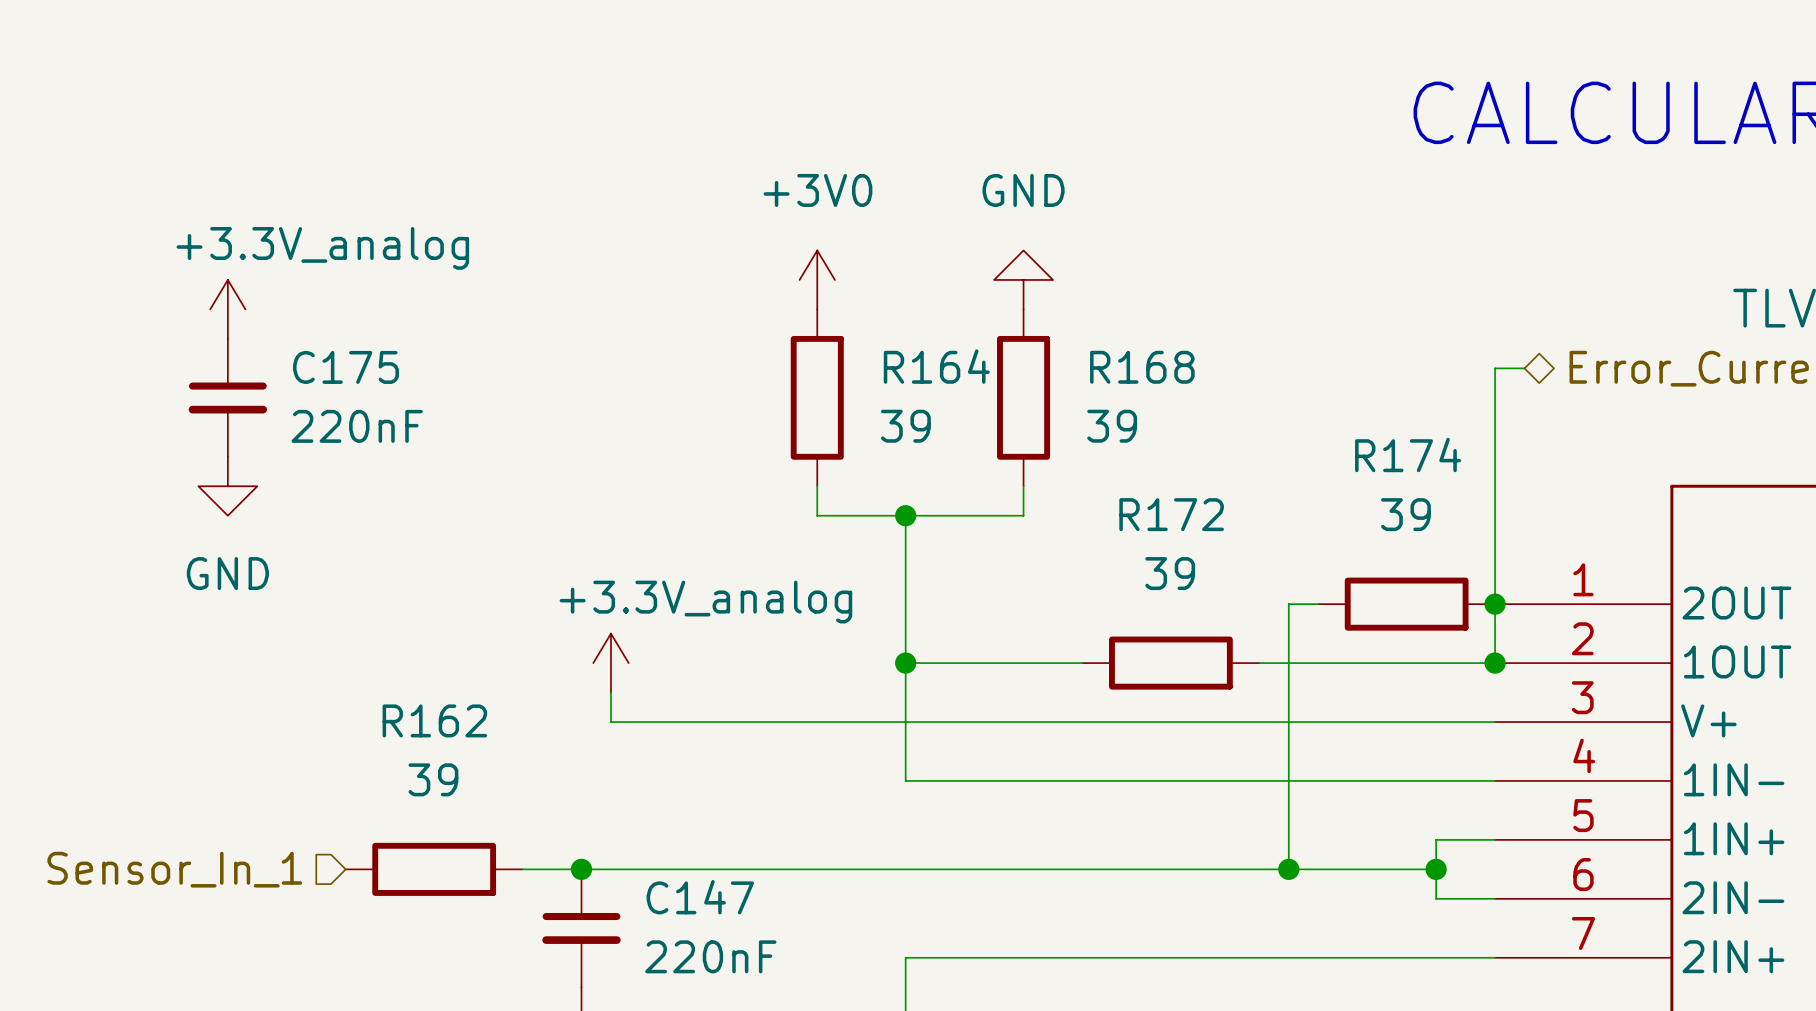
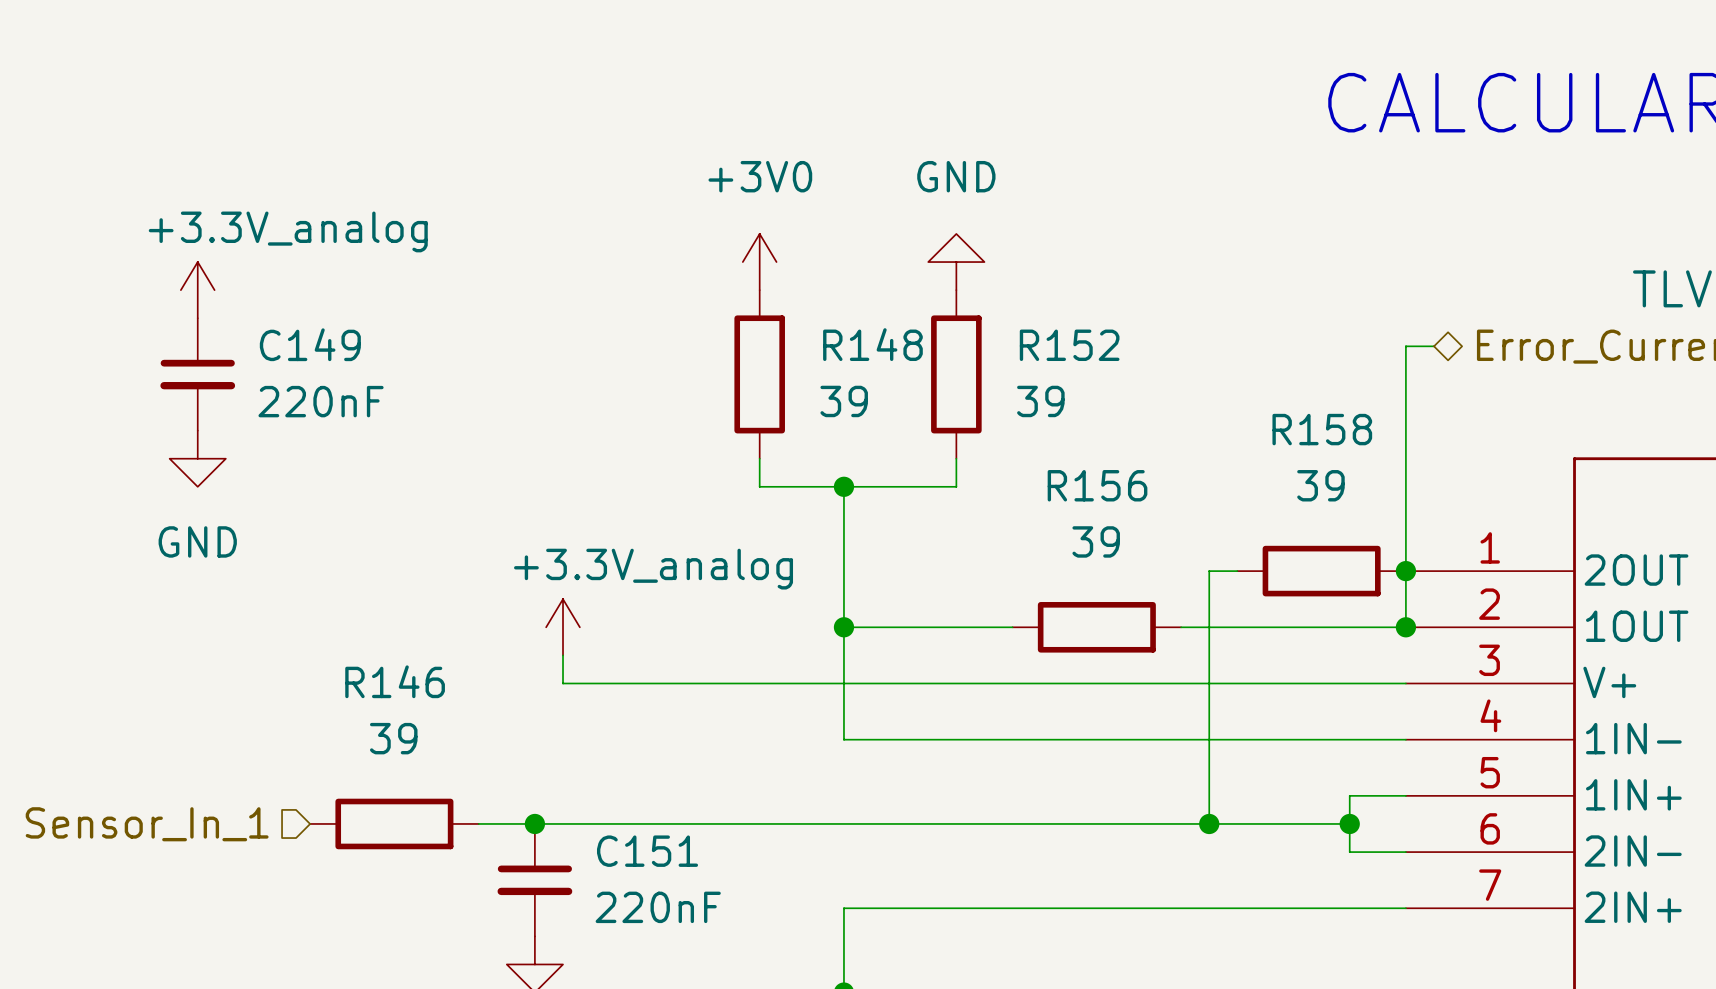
R164 name: R164 (936, 366) -> R148 (872, 344)
C175 name: C175 (345, 367) -> C149 (310, 344)
R168 name: R168 (1142, 367) -> R152 (1069, 345)
R174 name: R174 (1408, 454) -> R158 (1322, 429)
R172 name: R172 (1171, 514) -> R156 (1097, 485)
R162 name: R162 (434, 720) -> R146 (395, 681)
C147 name: C147 (700, 897) -> C151 (647, 851)

